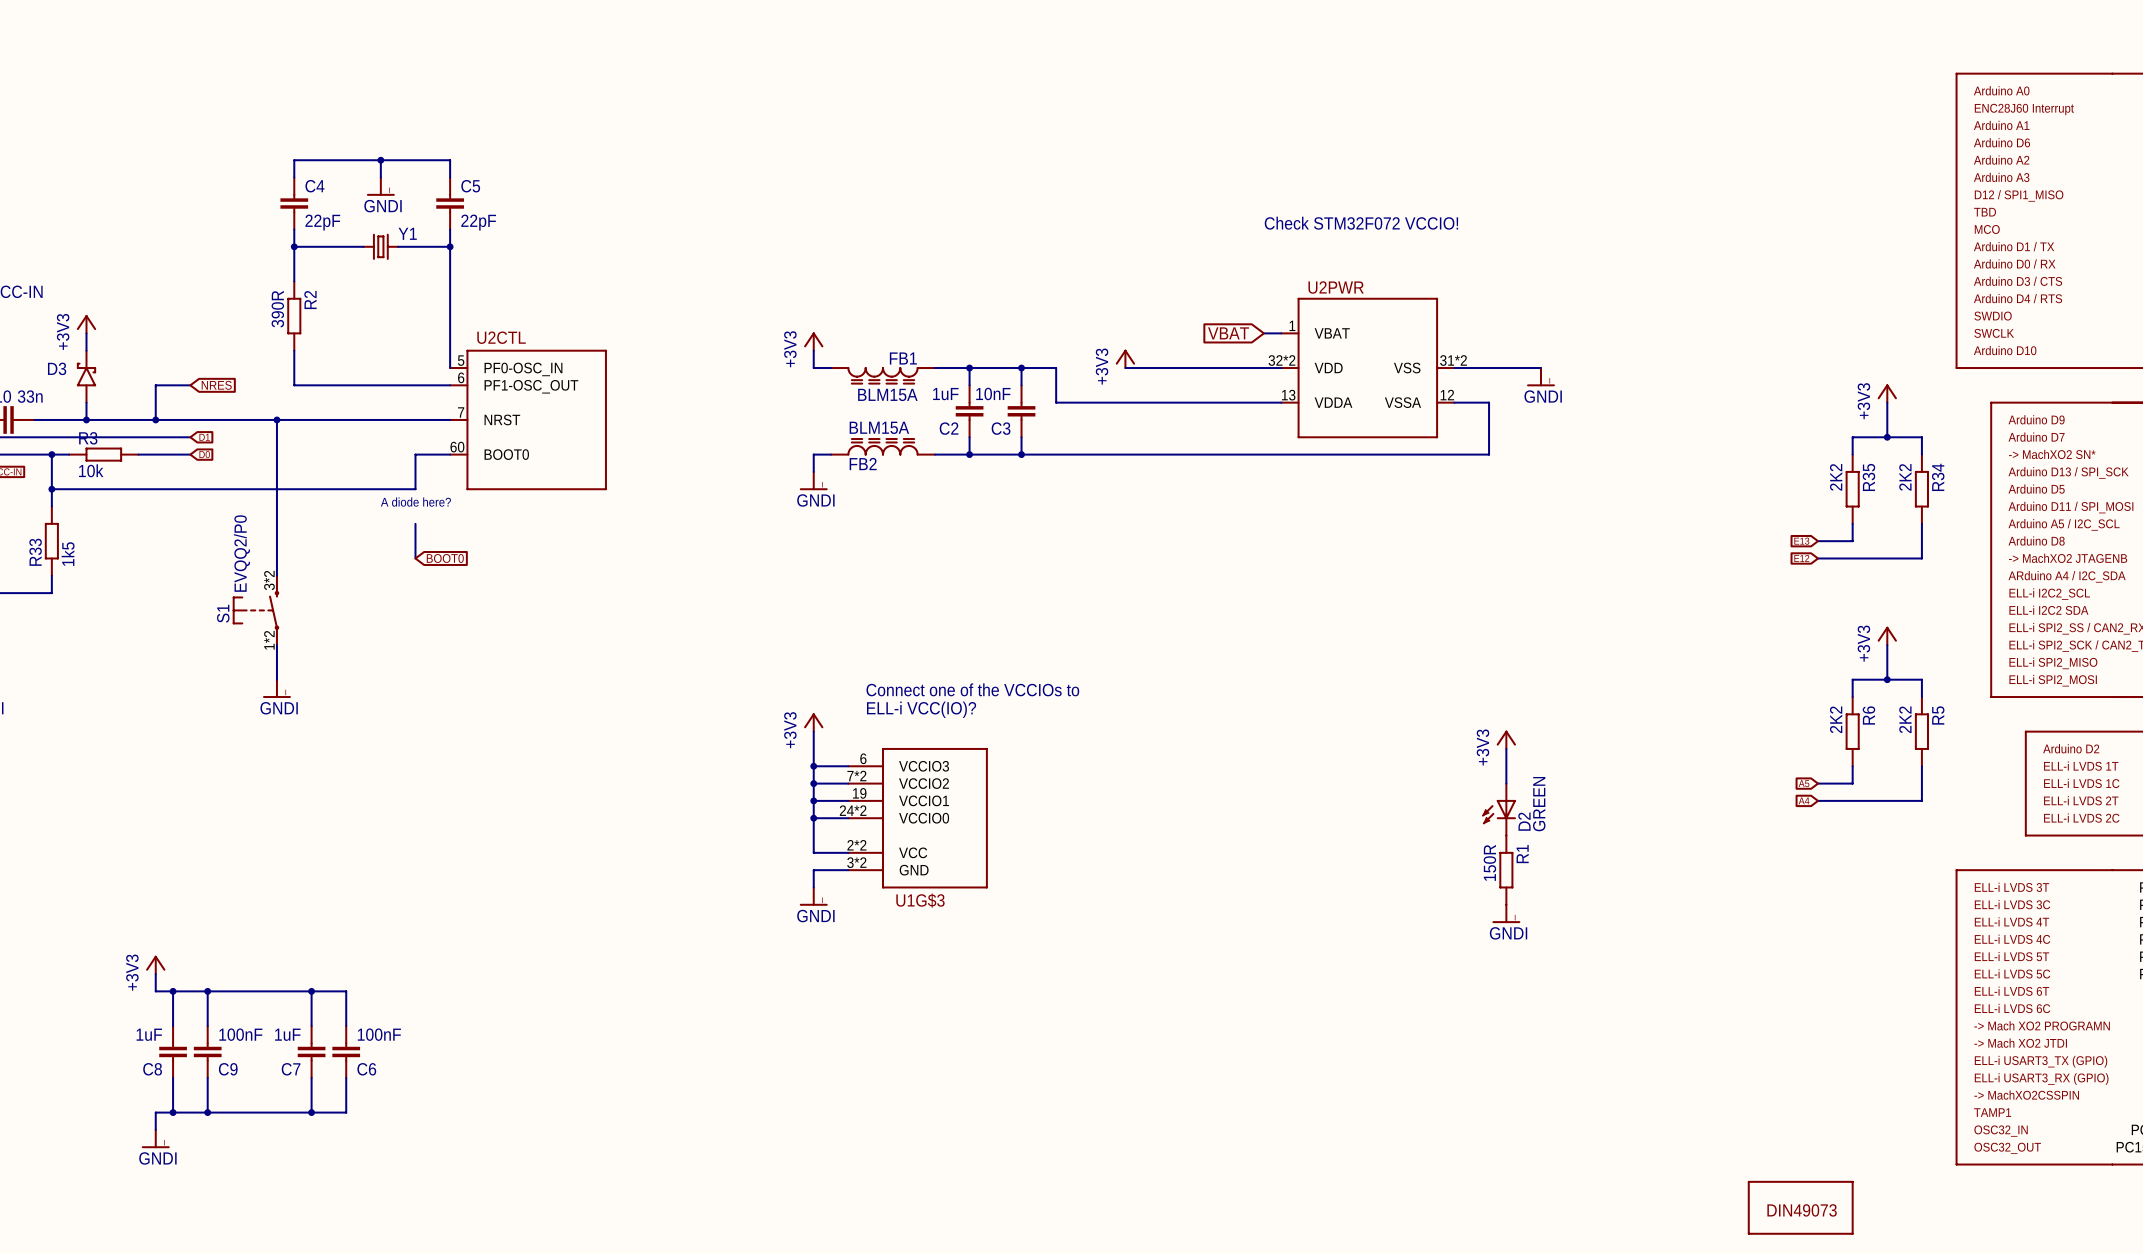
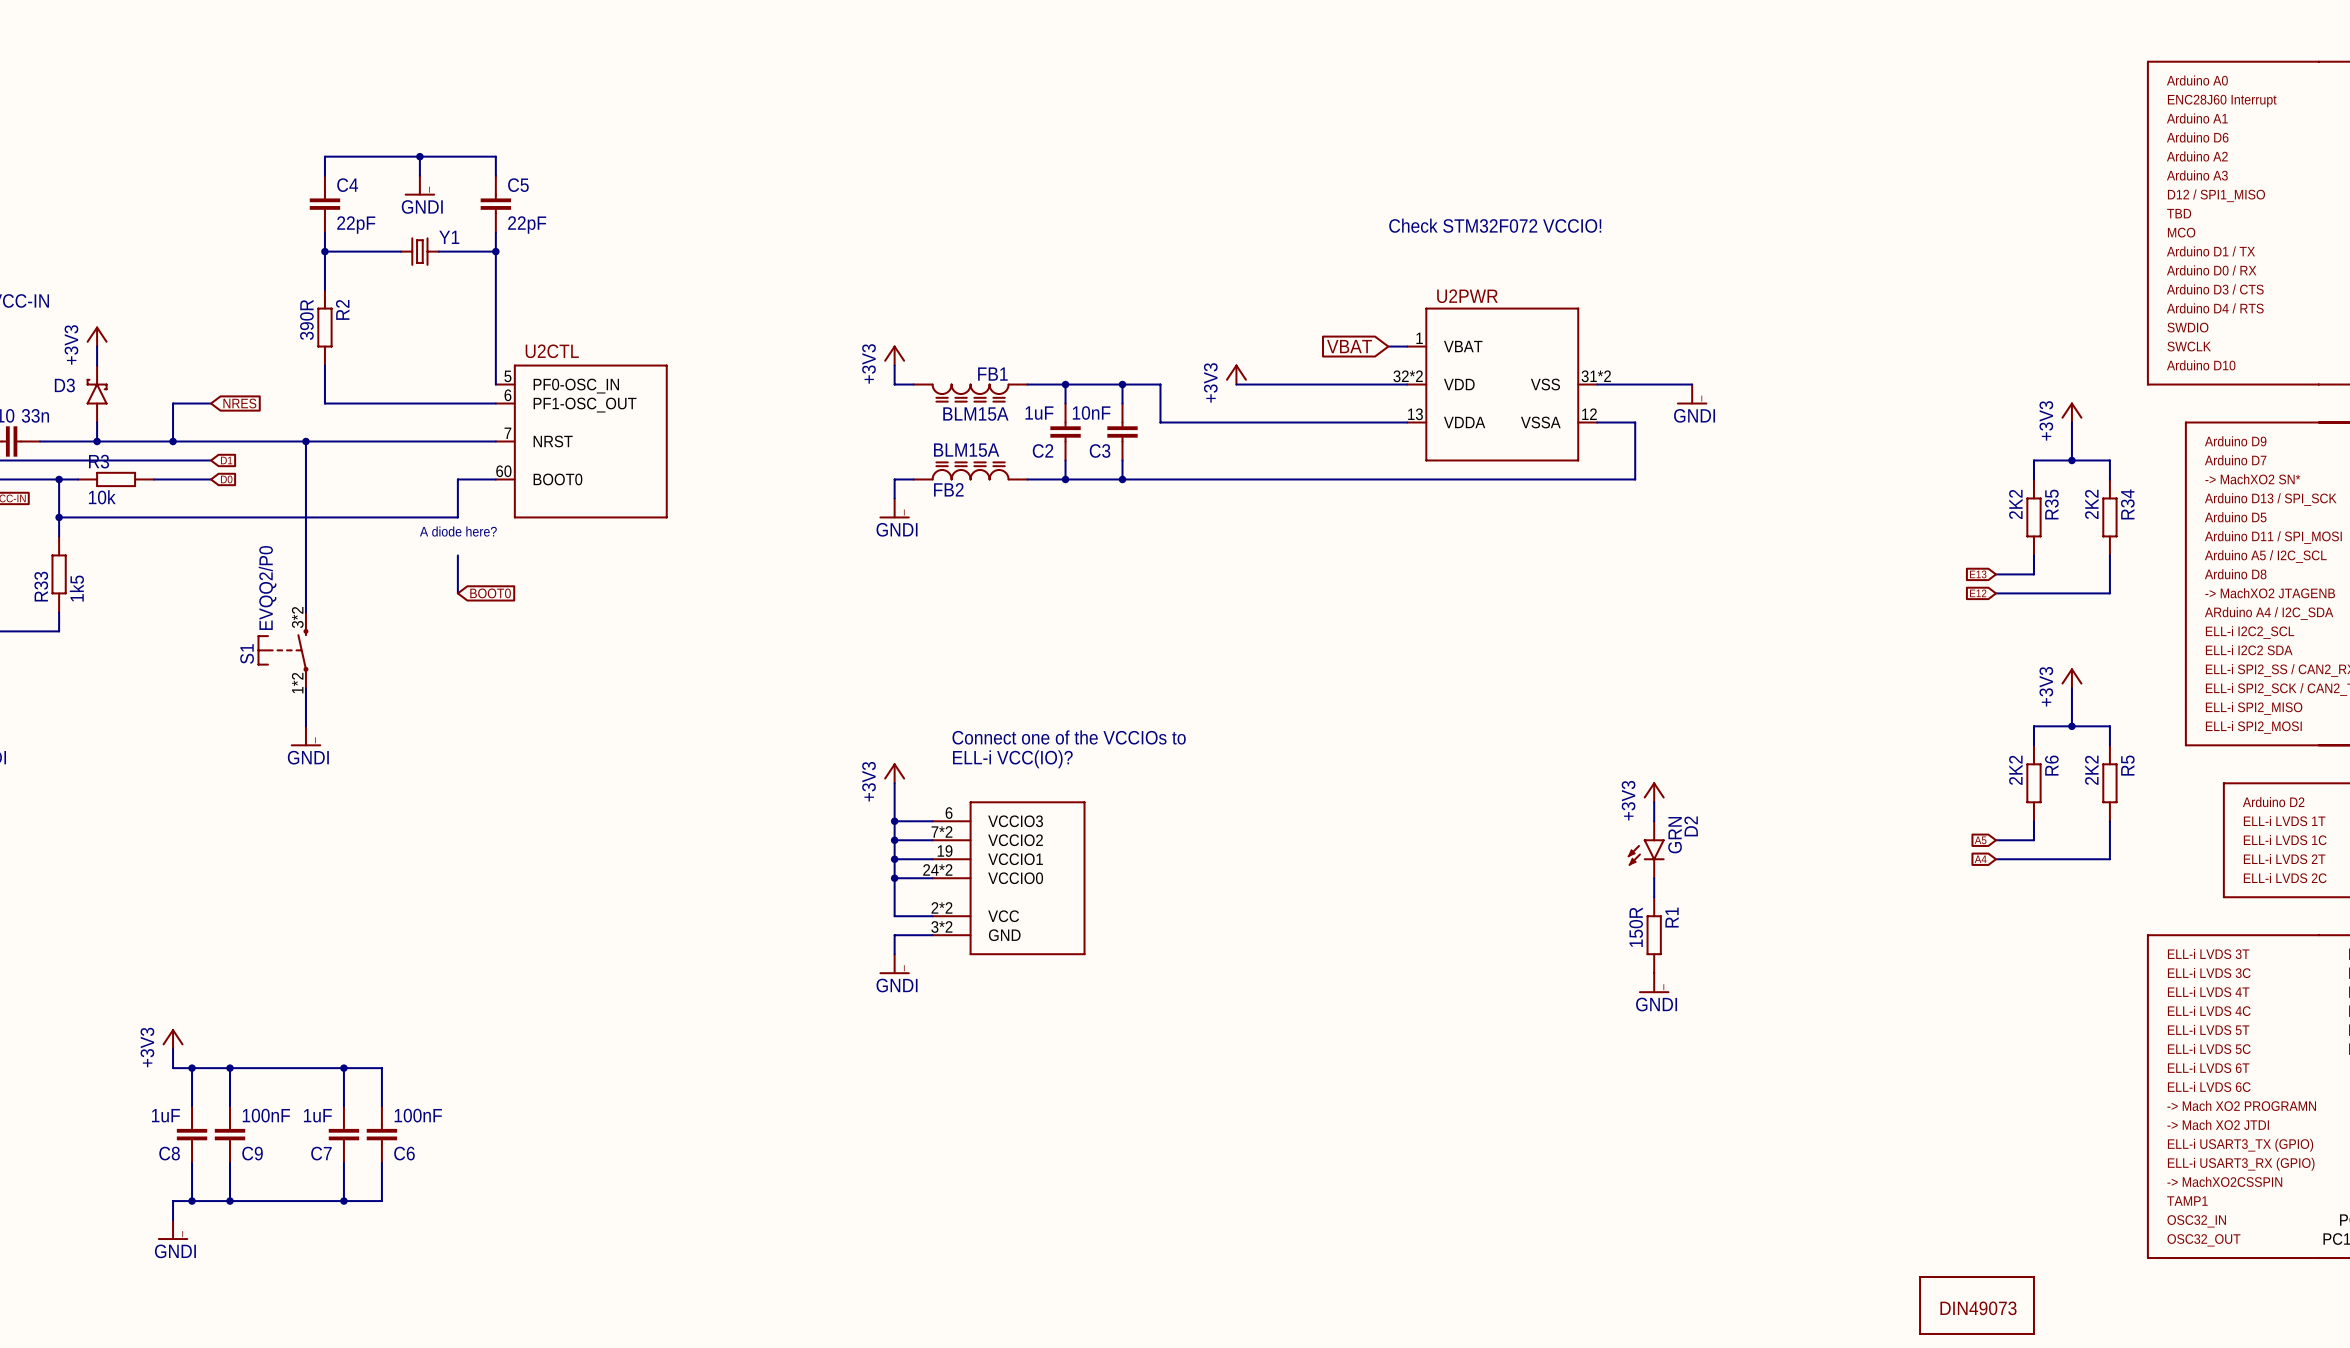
D2 symbol: [1482, 783, 1516, 836] -> [1627, 821, 1665, 879]
D2 value: GREEN (1539, 804) -> GRN (1675, 835)
D2 name position: D2 (1524, 821) -> D2 (1691, 826)
U1G$3 name: U1G$3 (920, 900) -> none

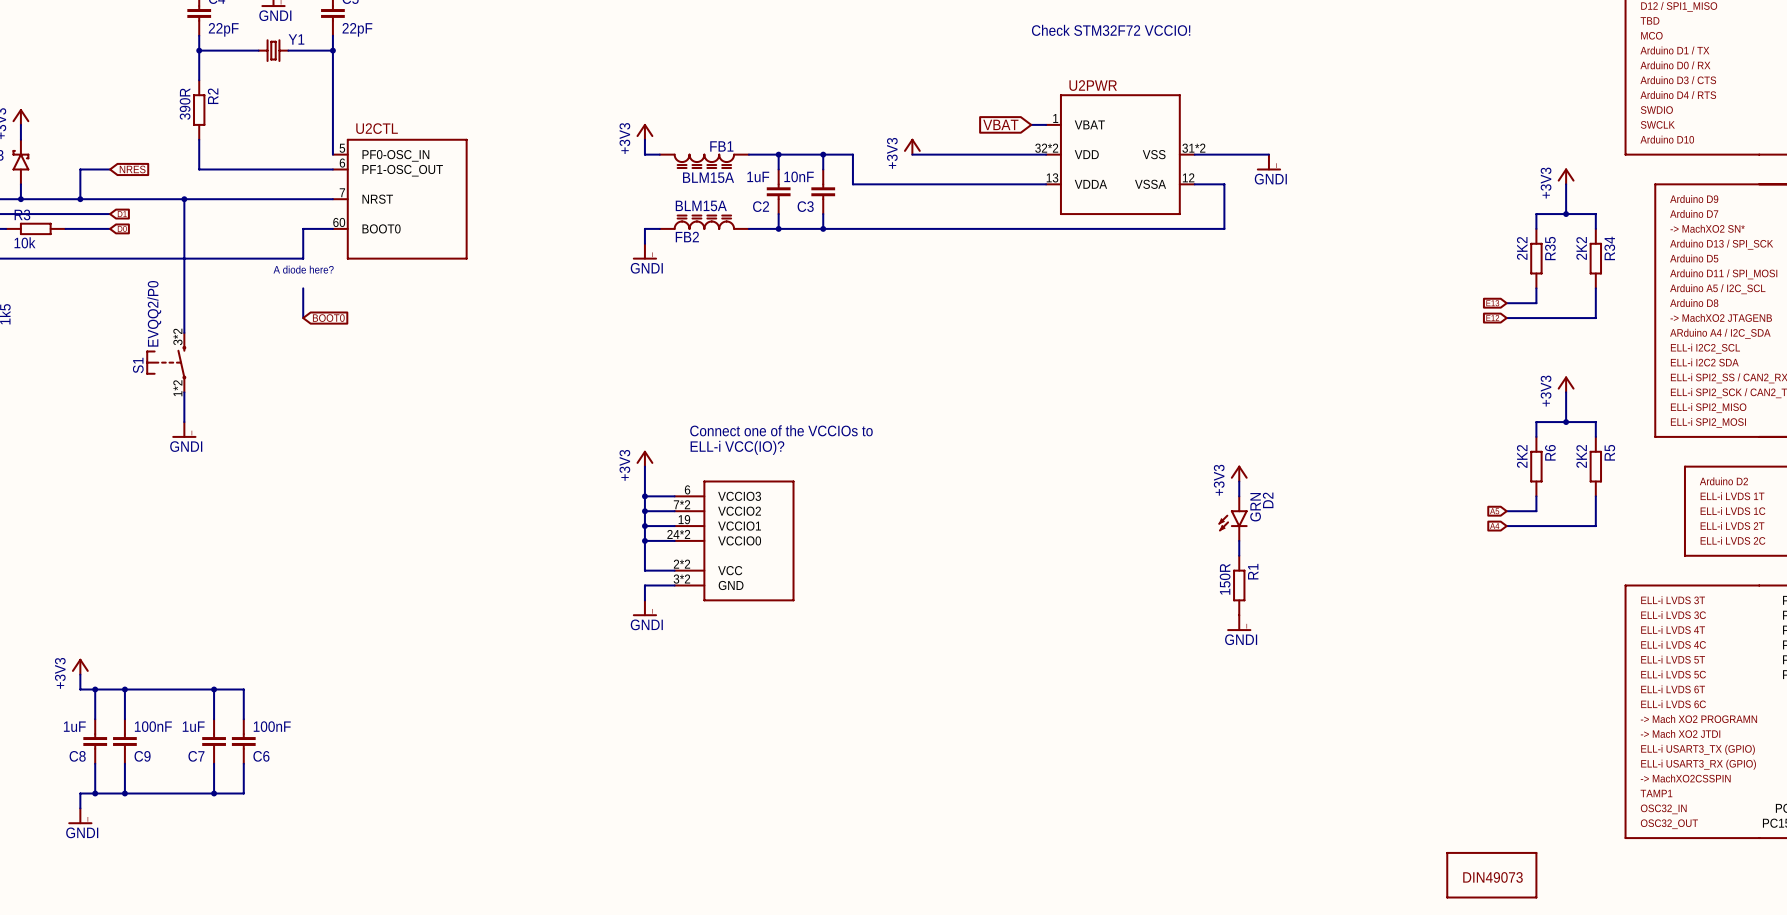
text: Check STM32F072 VCCIO! (1495, 225) -> Check STM32F72 VCCIO! (1111, 30)

